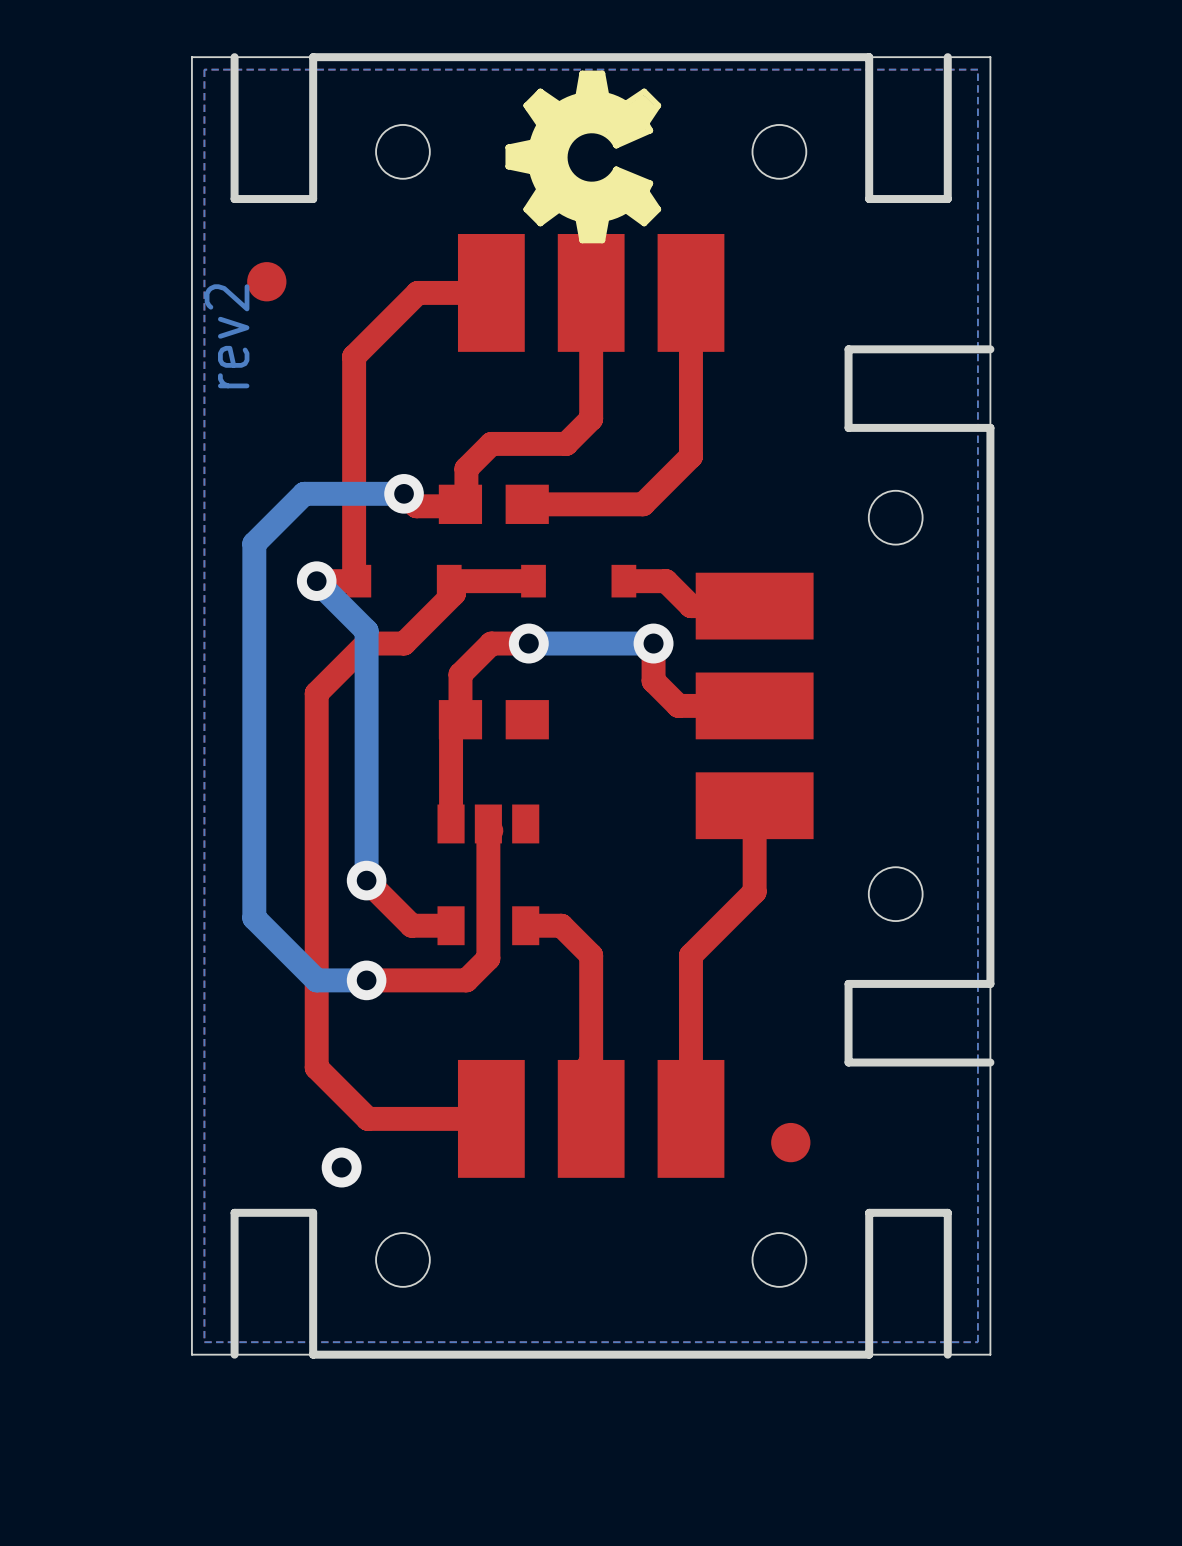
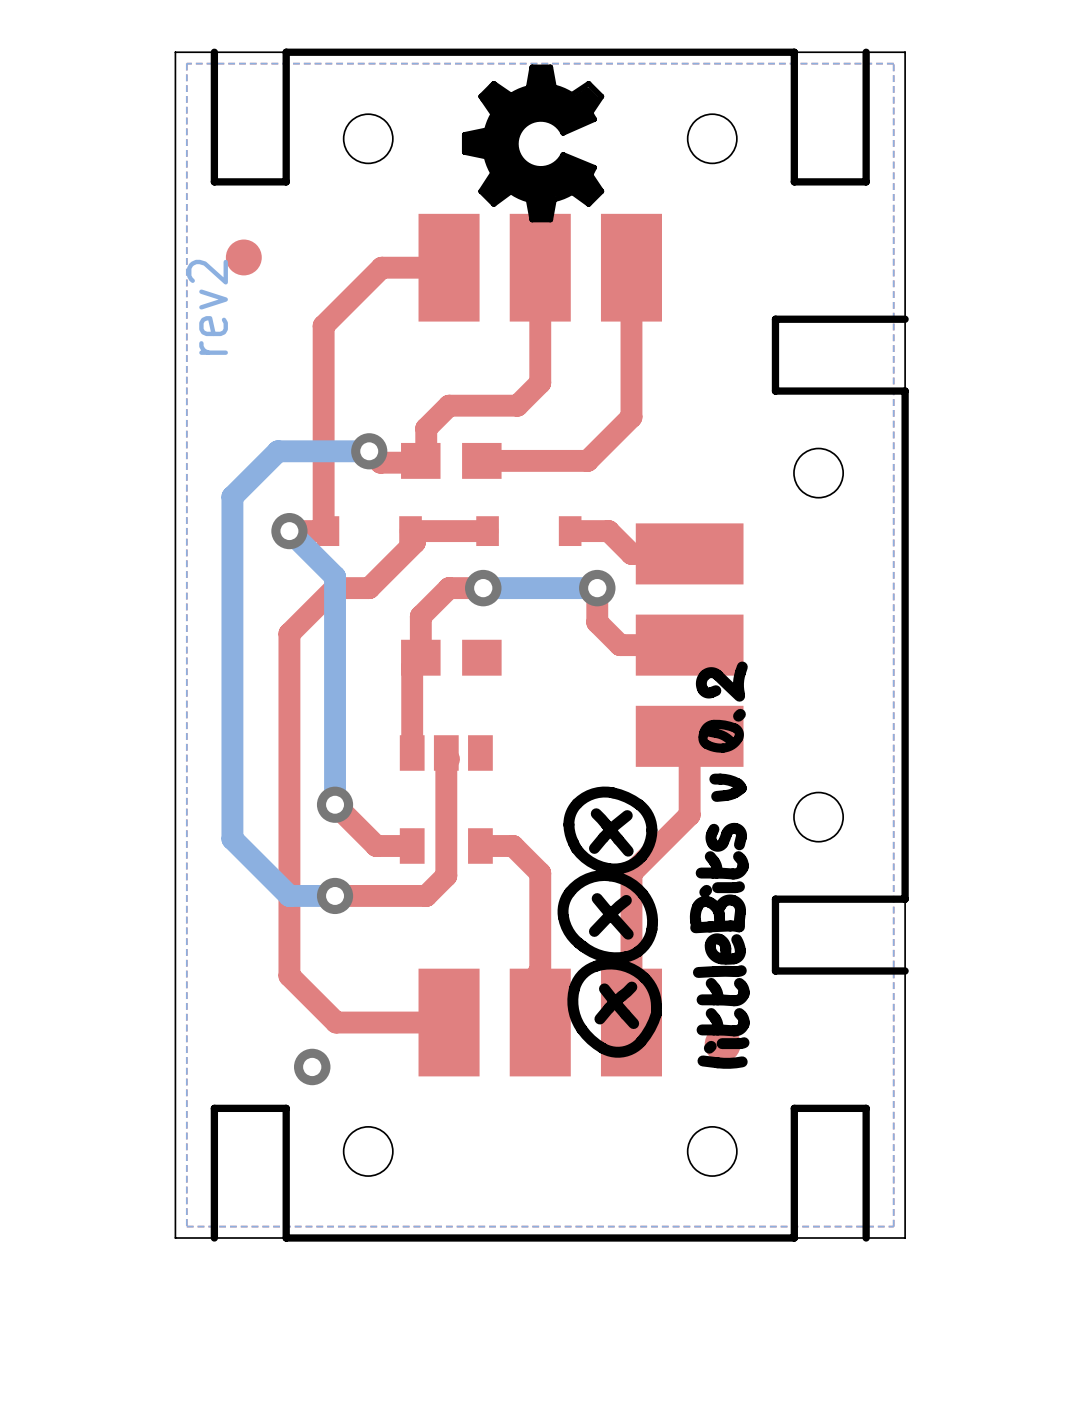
drawing: none -> [557, 661, 750, 1069]

